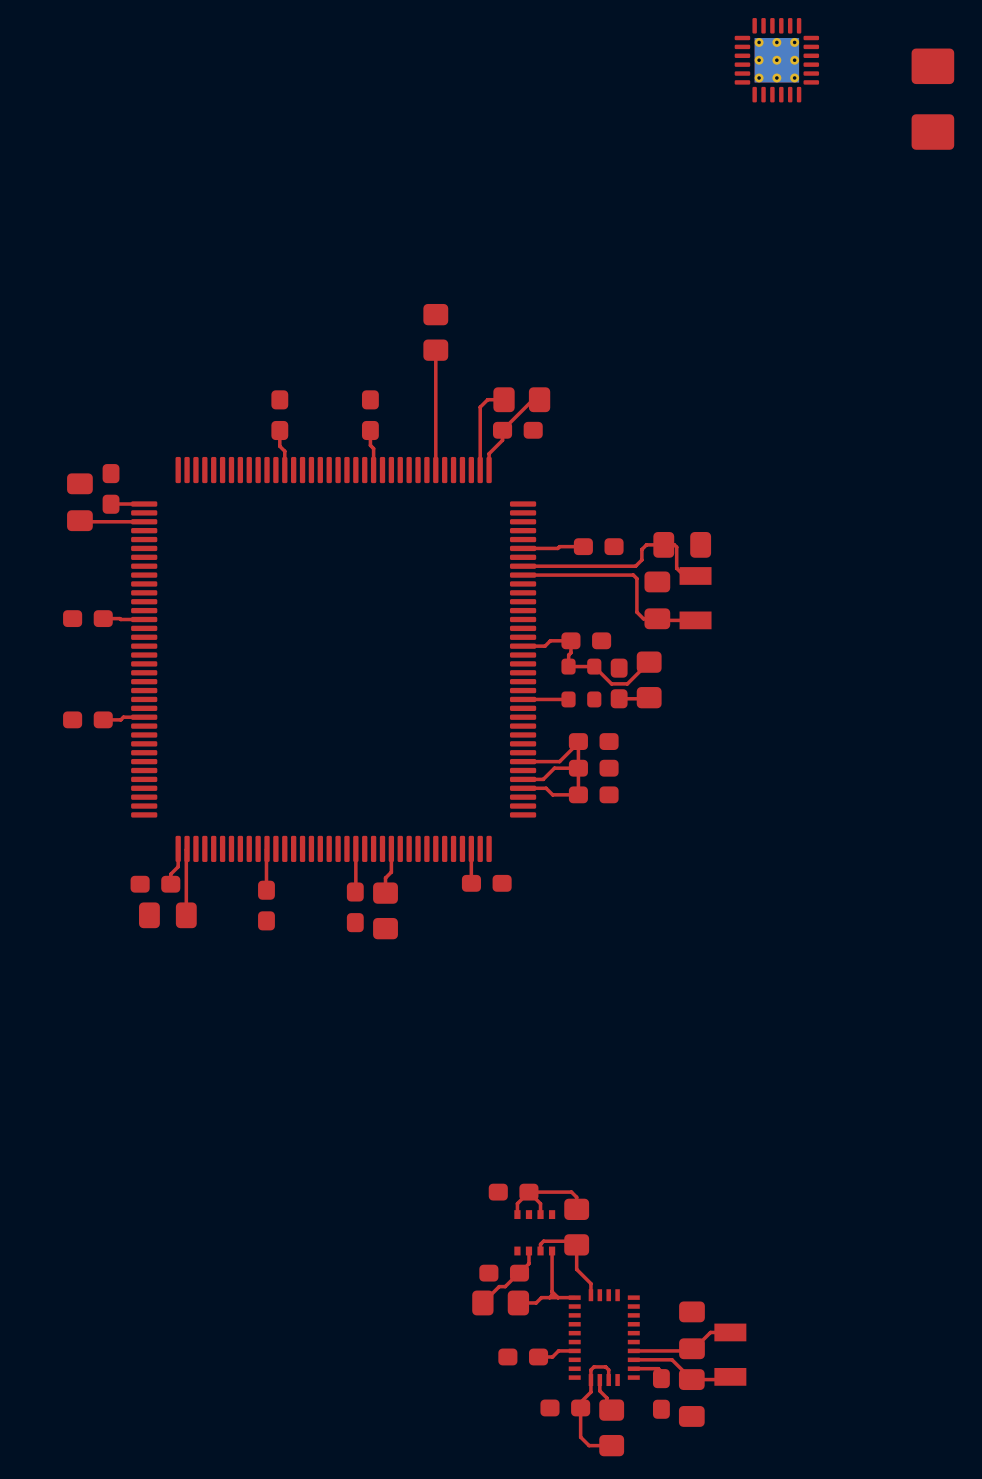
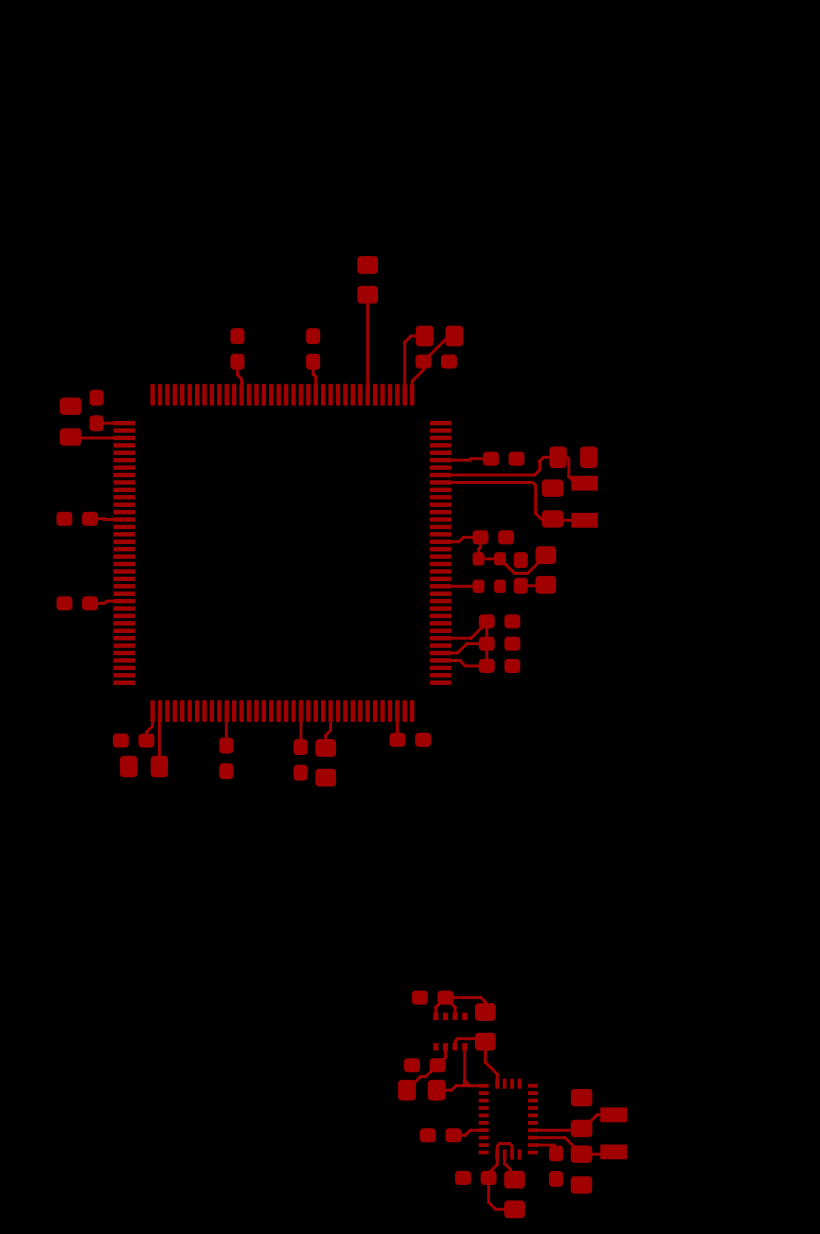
part: (776, 60) -> none
part: (932, 99) -> none

